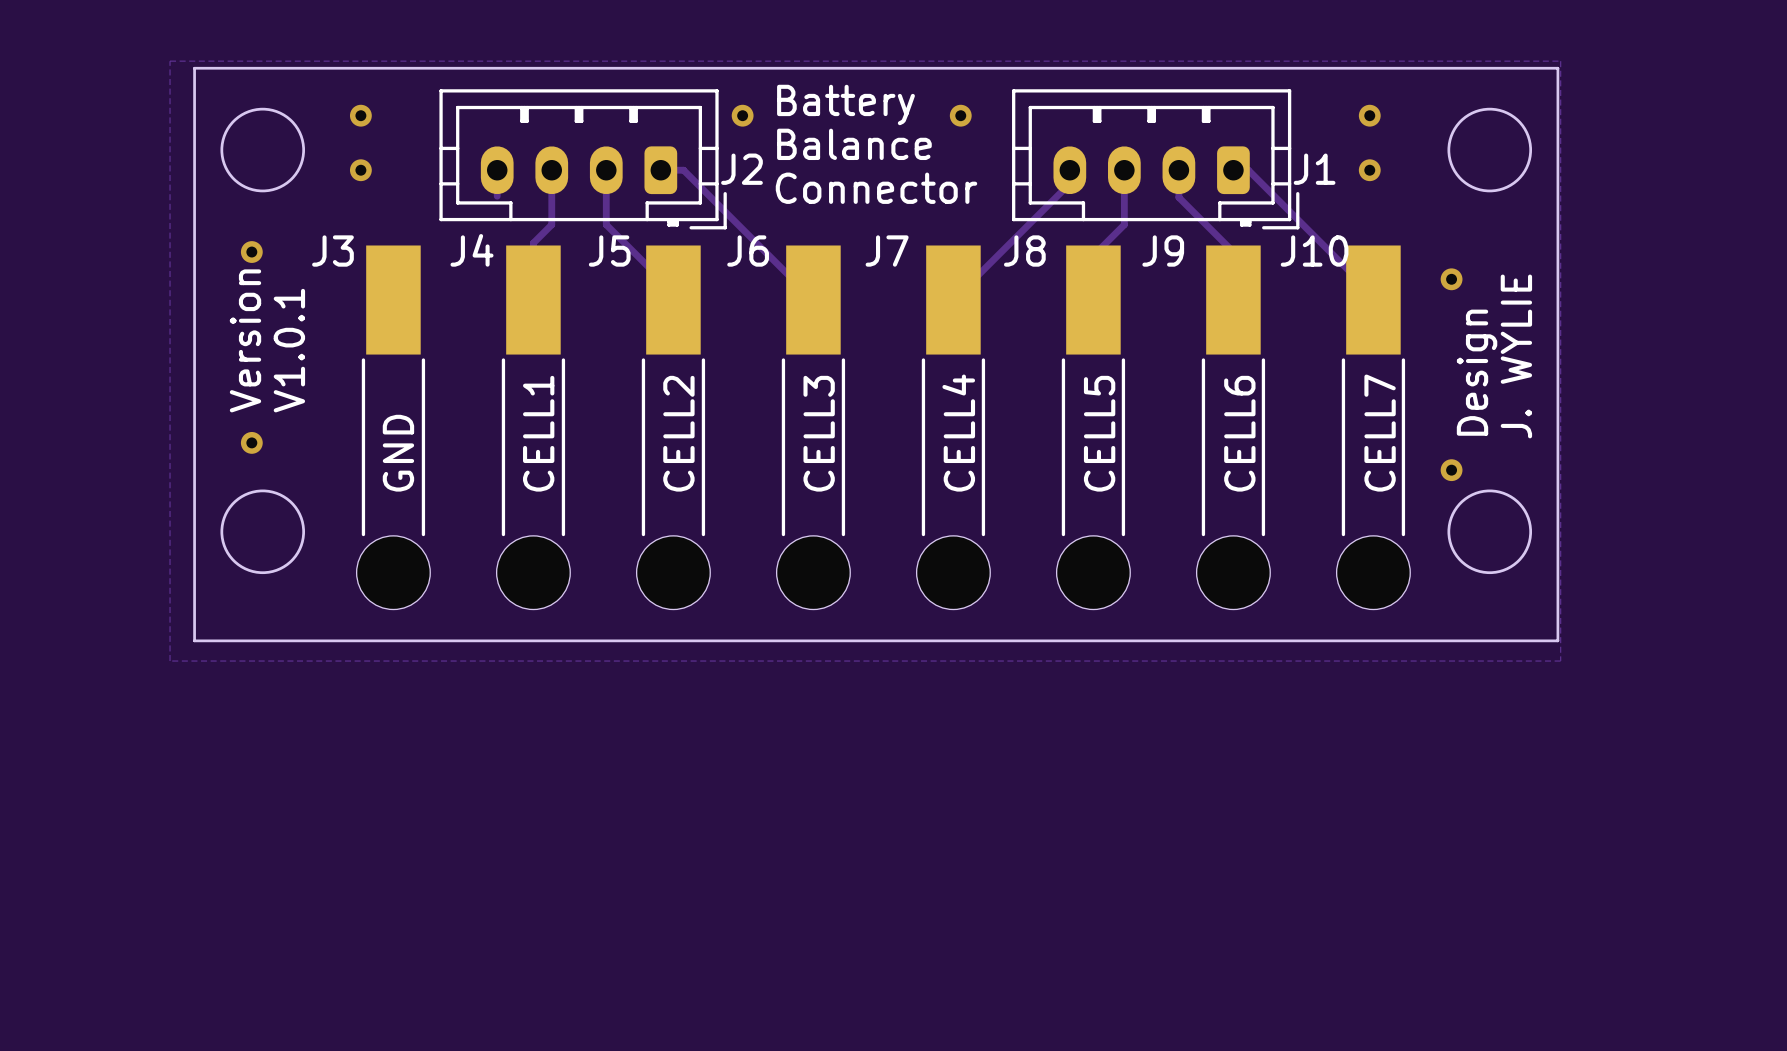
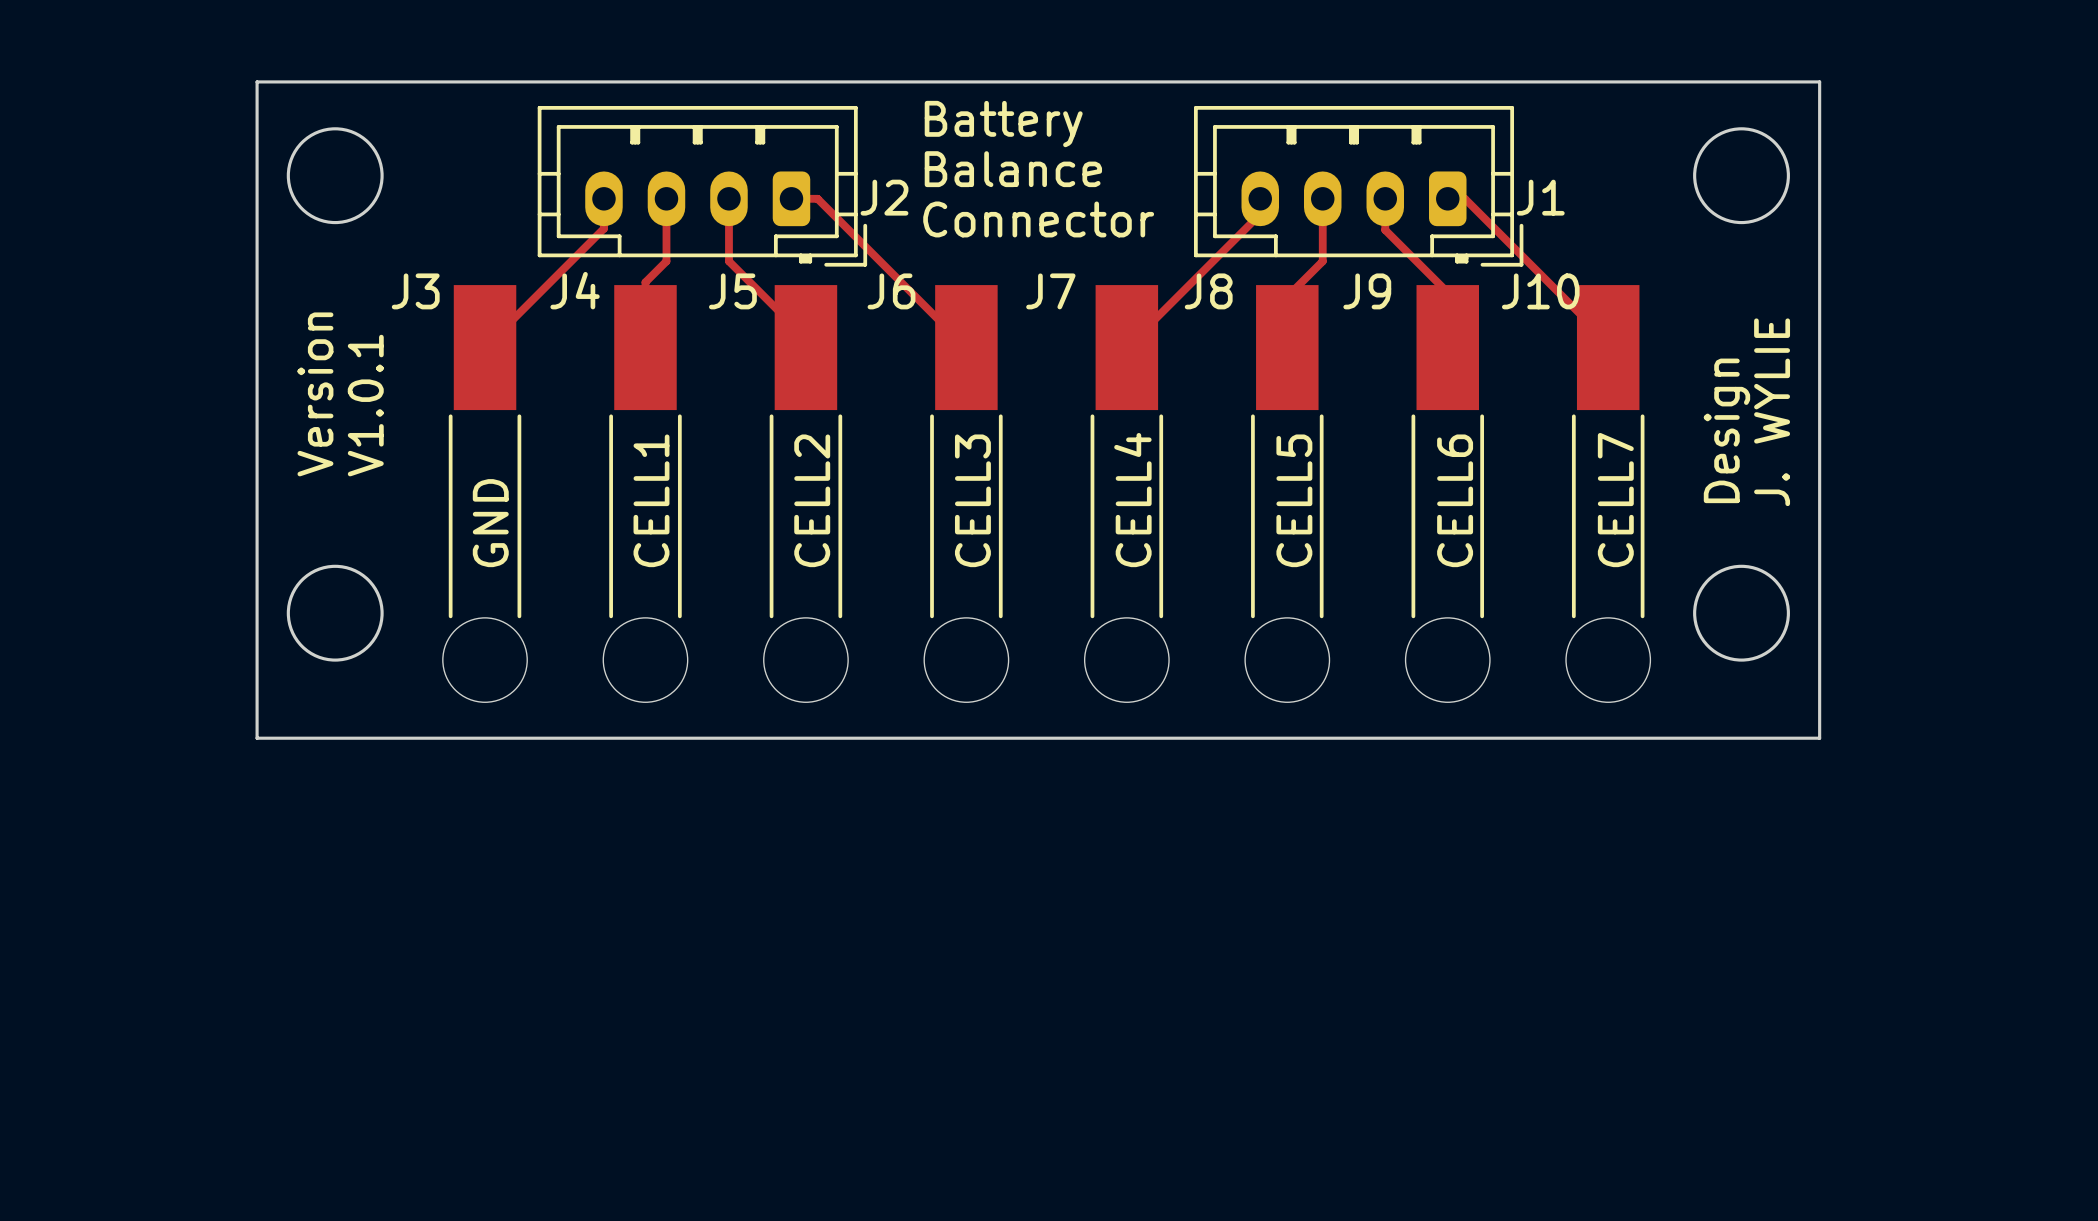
zone outline: (170, 61) (1560, 61) (1560, 661) (170, 661) (170, 61) -> none
via: (360, 115) -> none
via: (742, 115) -> none
via: (960, 115) -> none
via: (1369, 115) -> none
via: (360, 170) -> none
via: (1369, 170) -> none
track: none -> (603, 228) (485, 347)
via: (251, 252) -> none
via: (1451, 279) -> none
via: (251, 442) -> none
via: (1451, 470) -> none

